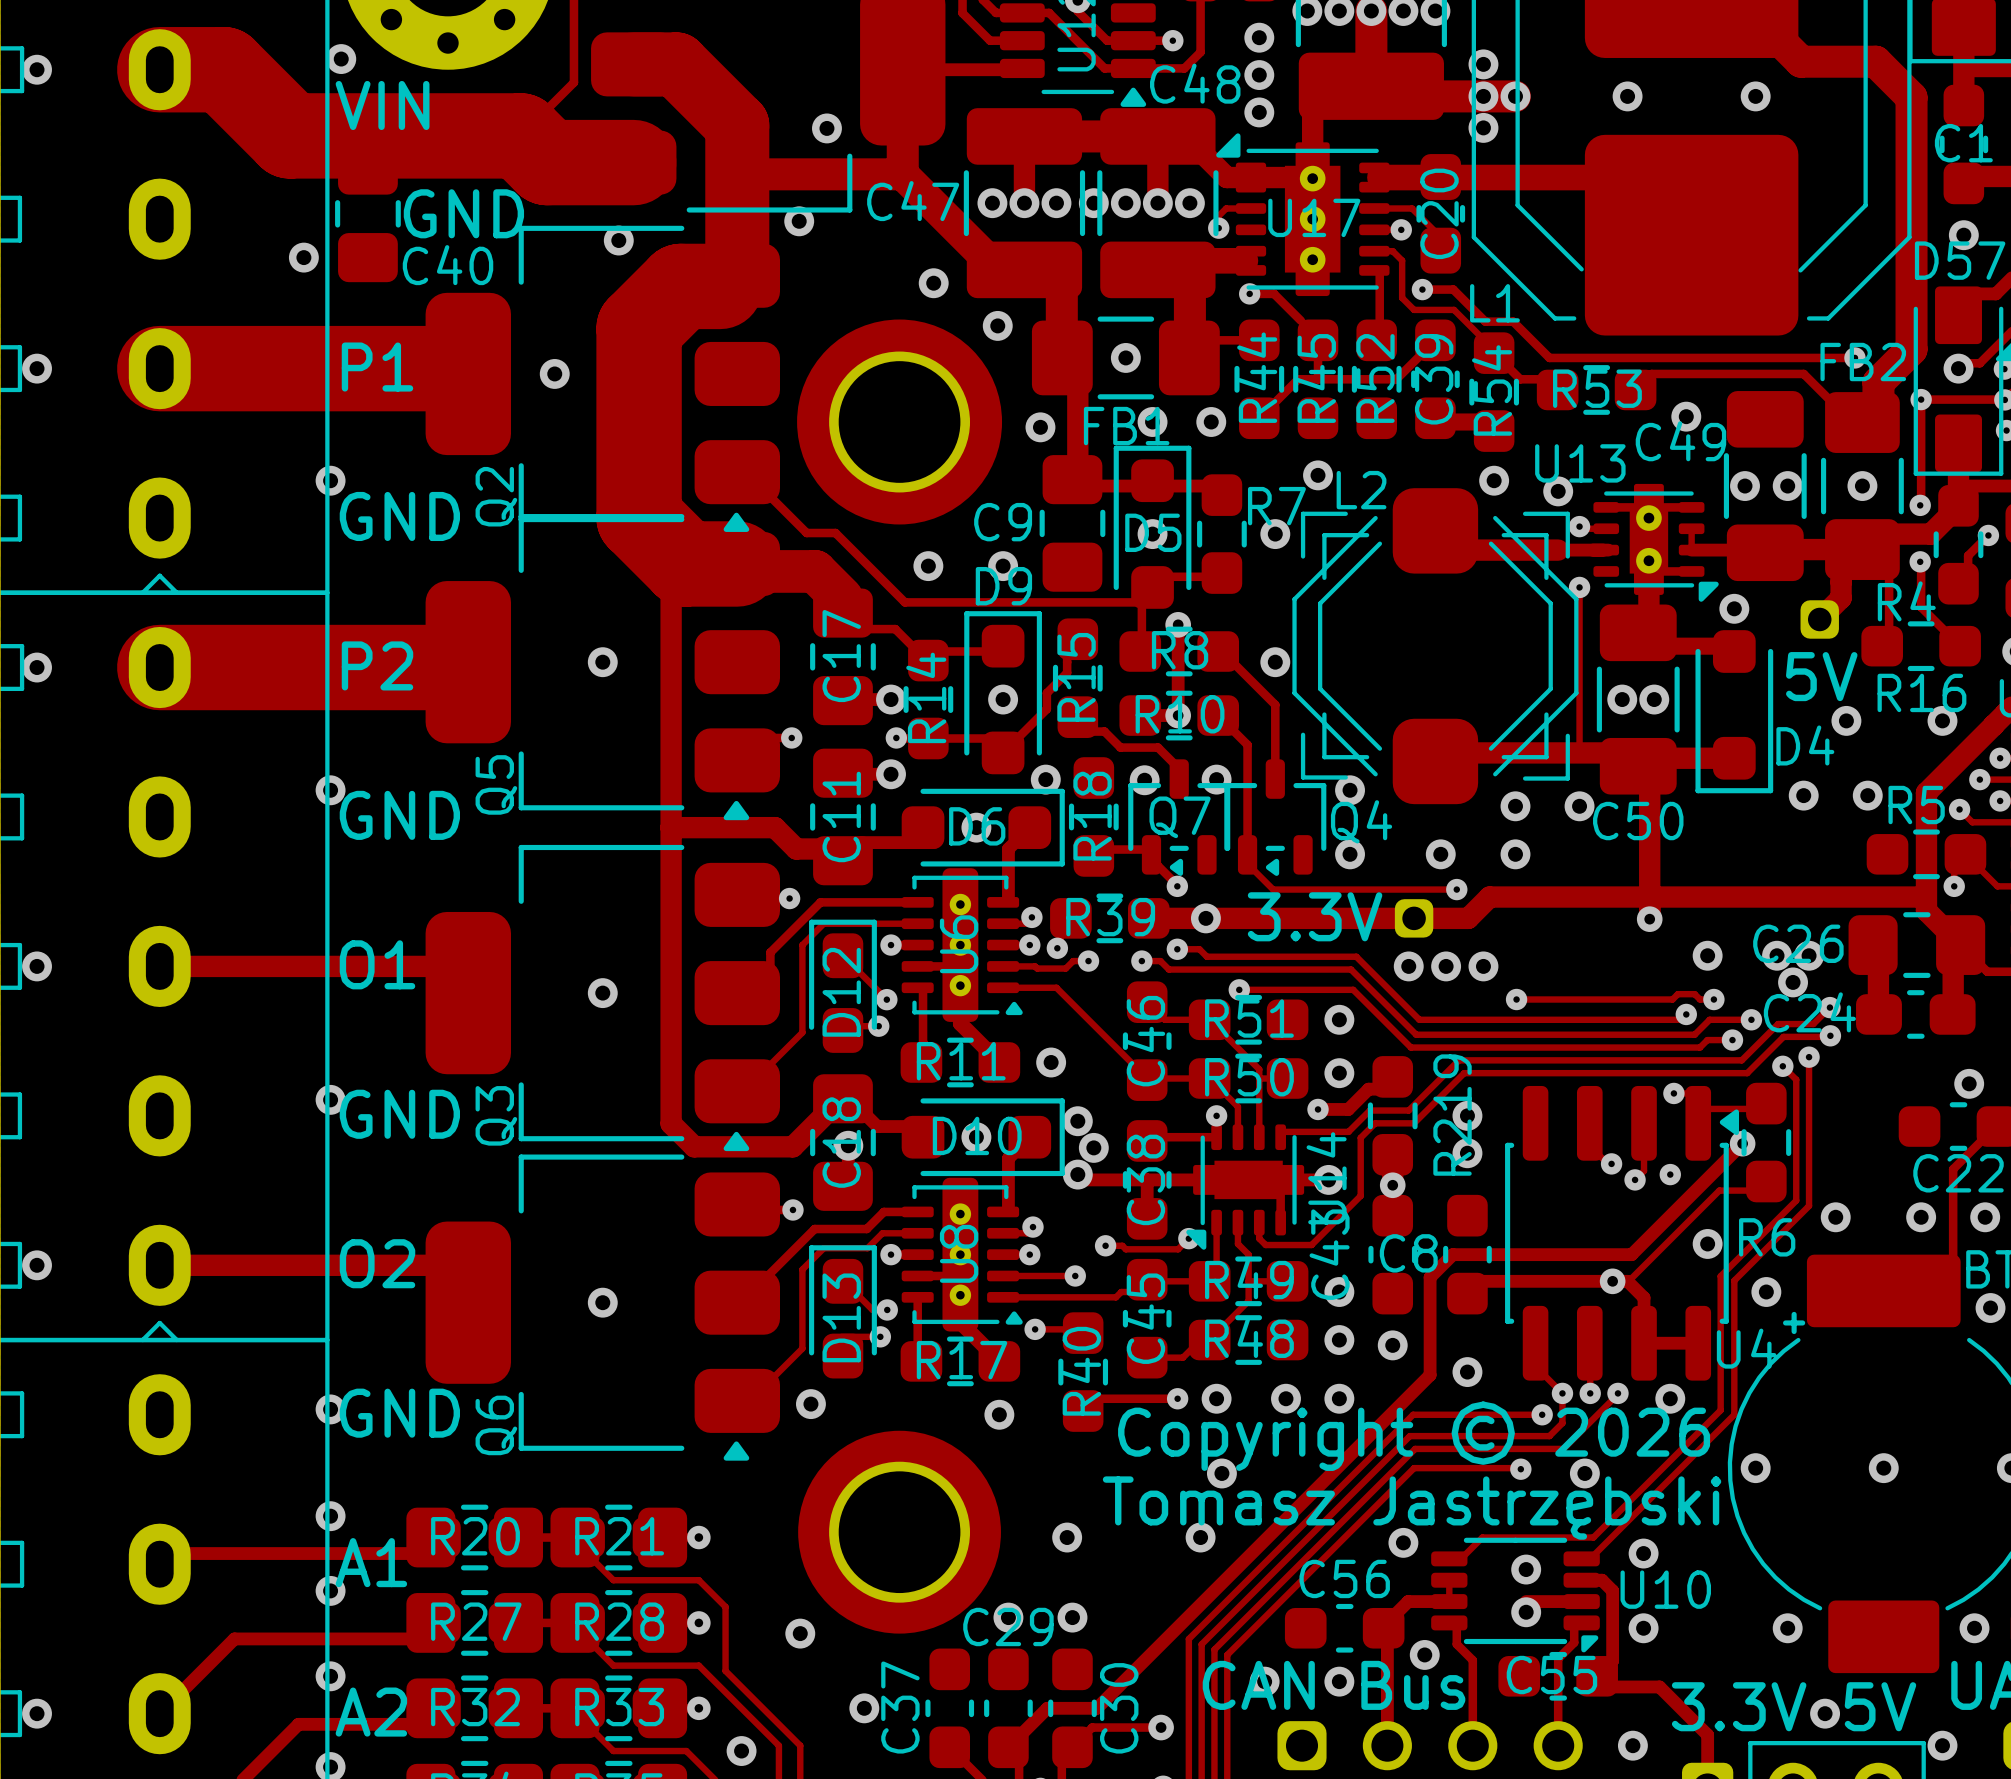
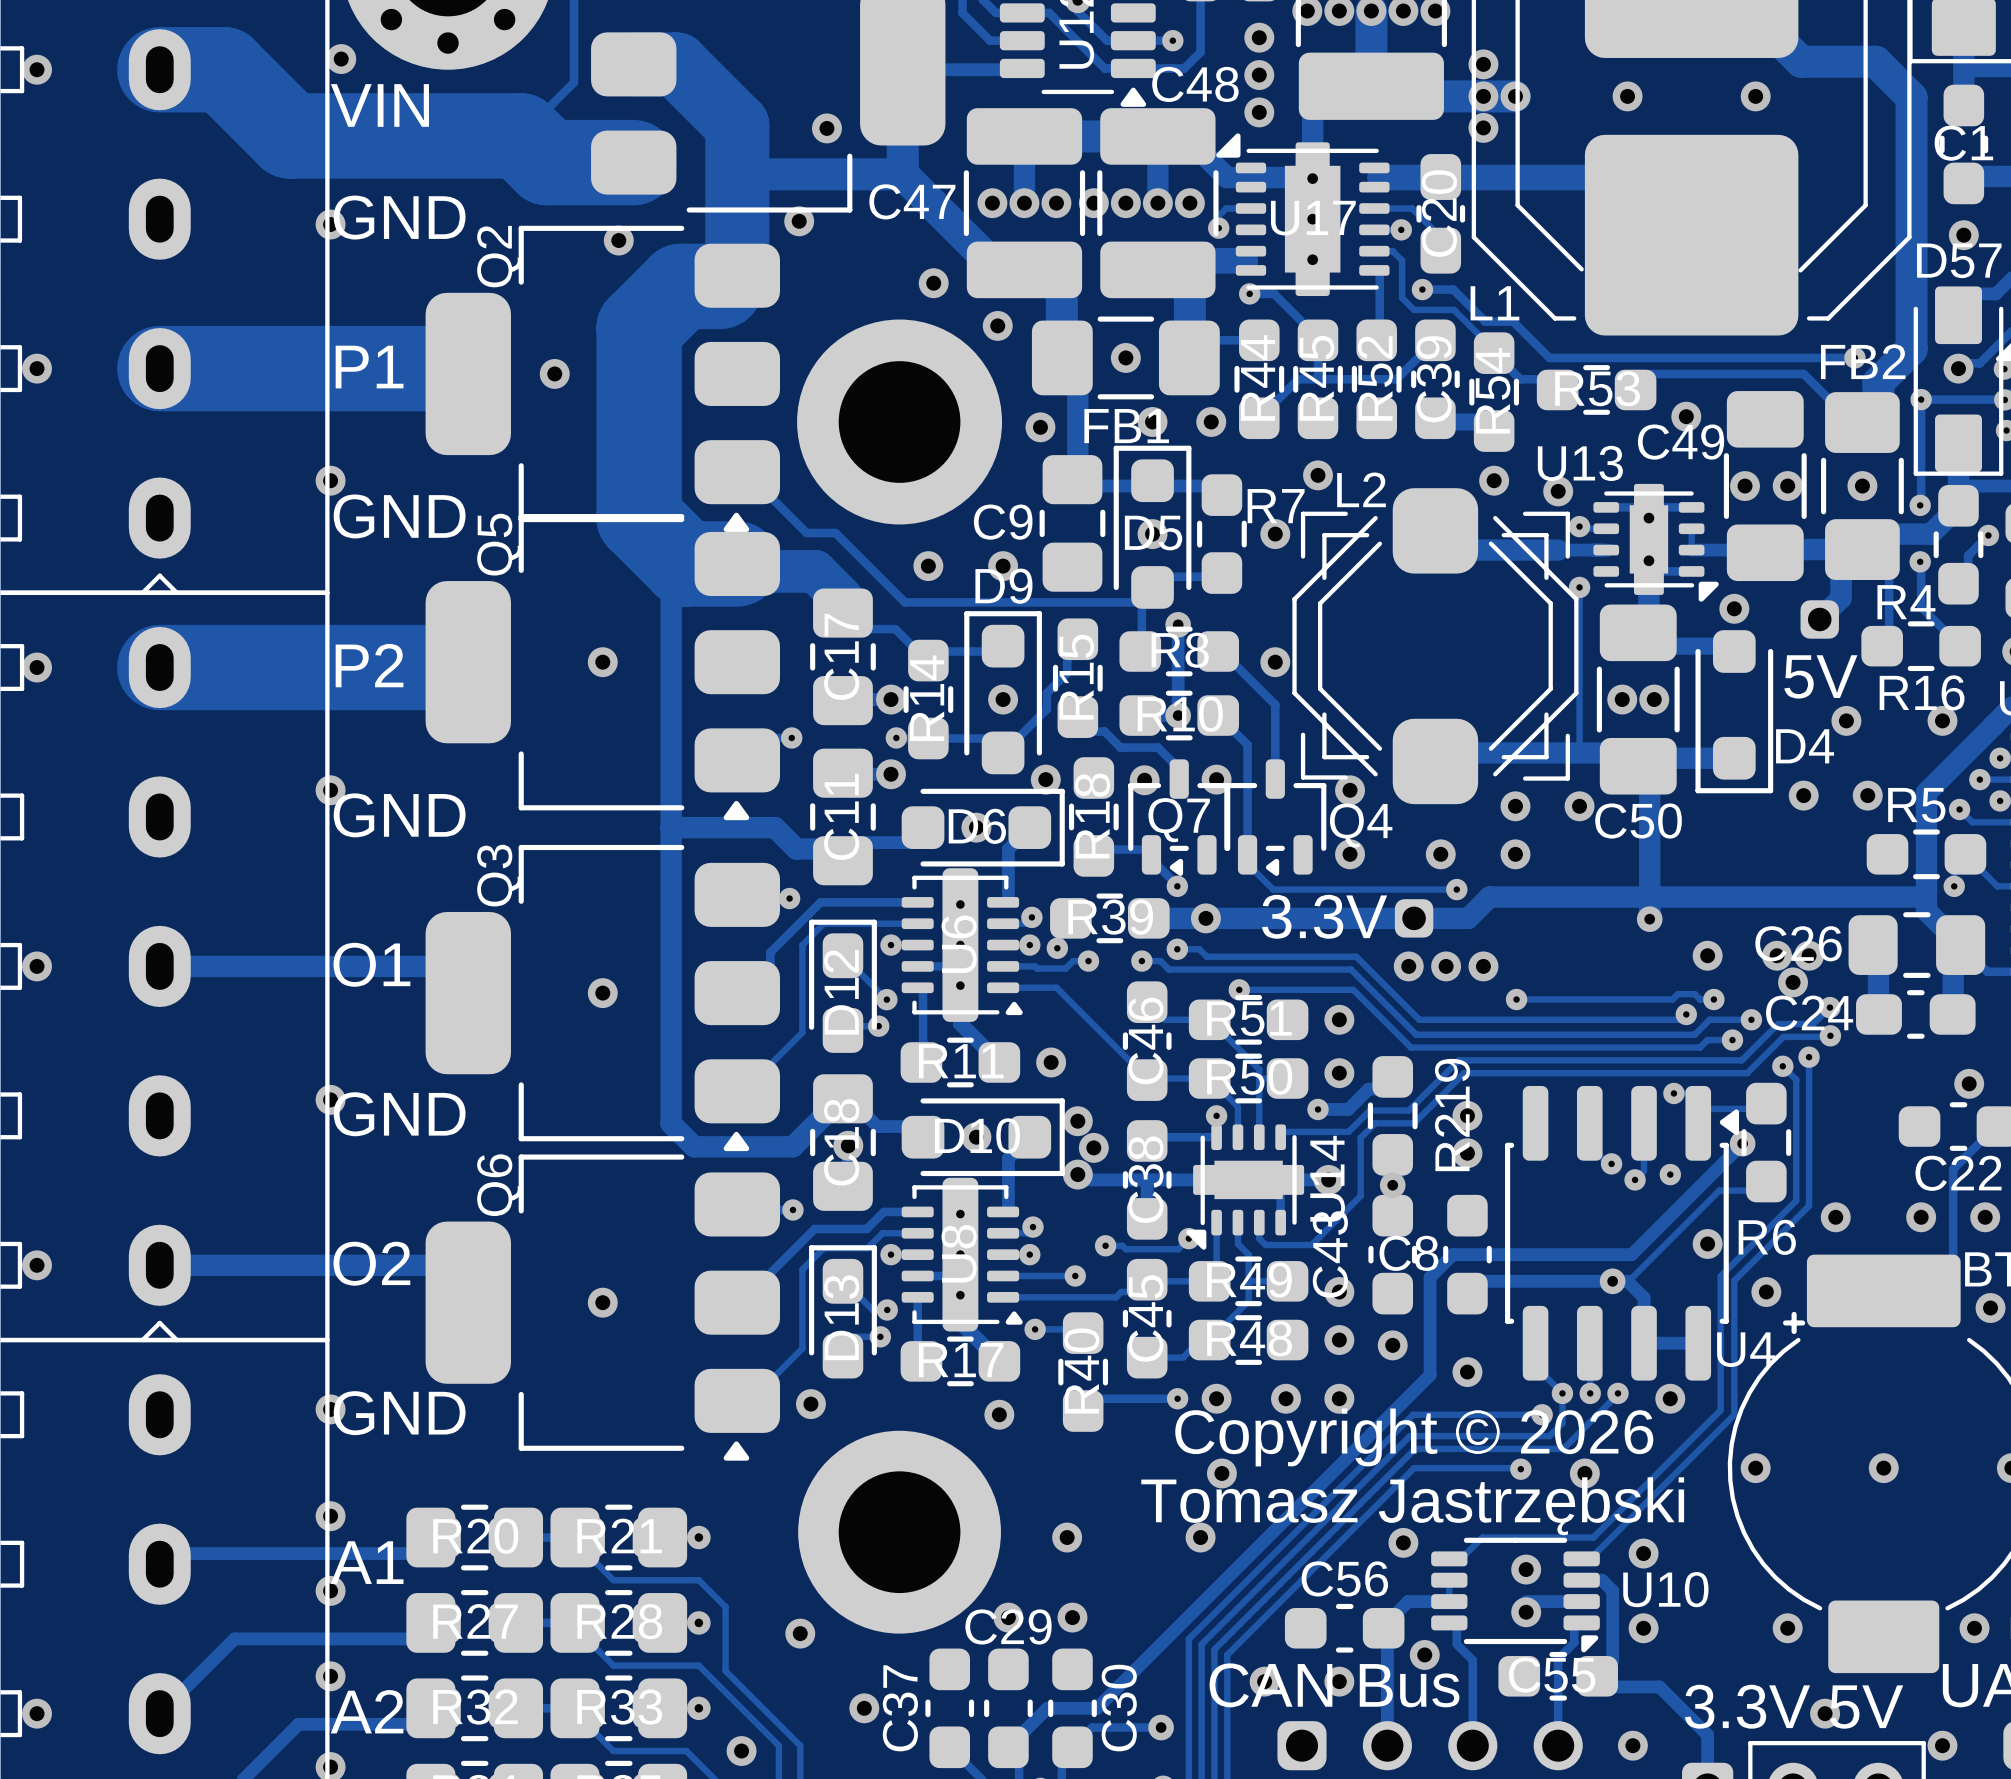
C40: (367, 213) -> none
text position: GND (463, 213) -> GND (399, 217)
via position: (303, 257) -> (330, 224)
Q2 name position: Q2 (496, 496) -> Q2 (499, 256)
Q5 name position: Q5 (496, 784) -> Q5 (499, 544)
Q3 name position: Q3 (496, 1115) -> Q3 (499, 875)
Q6 name position: Q6 (496, 1425) -> Q6 (499, 1185)

